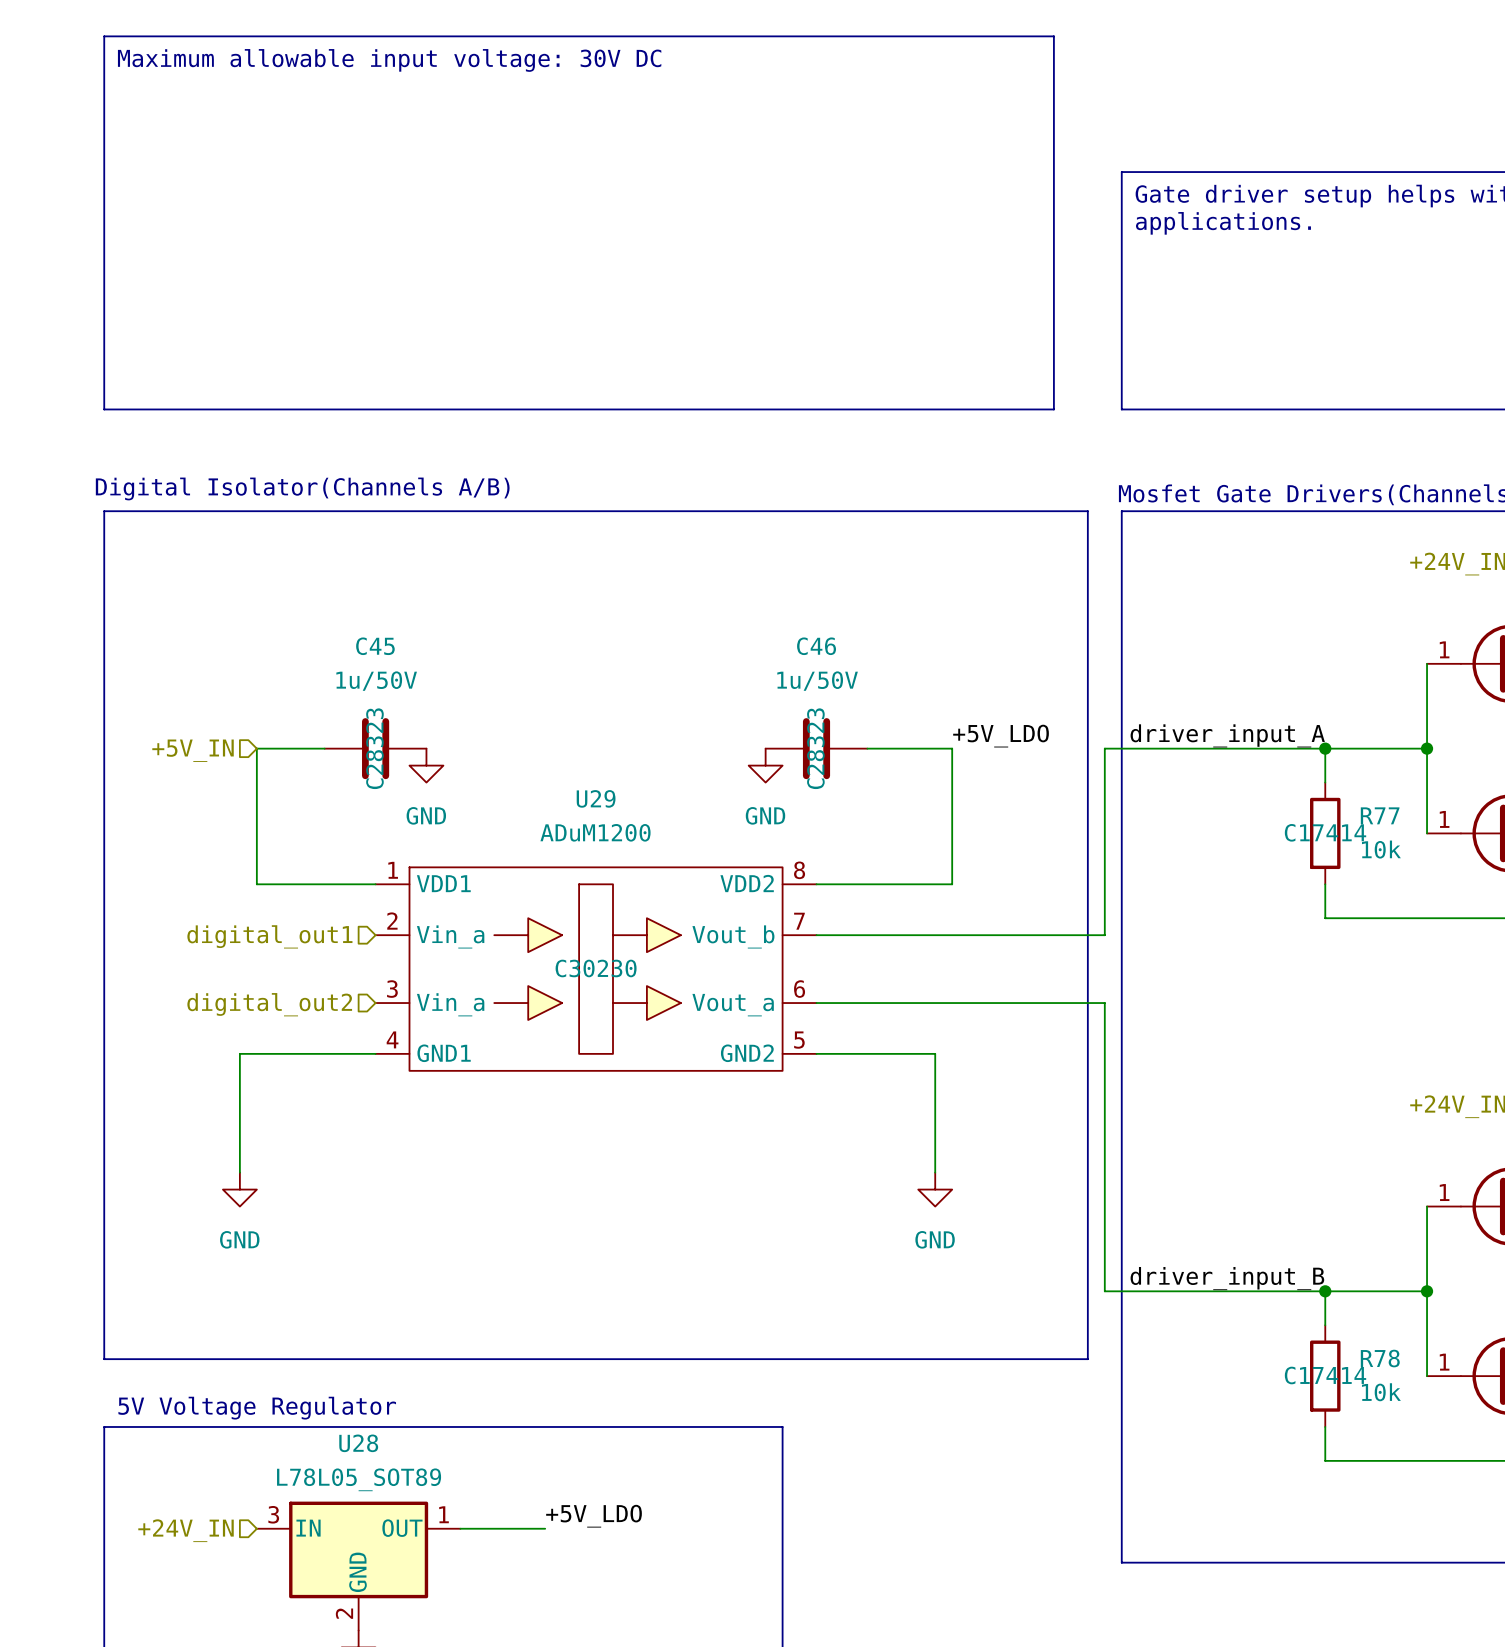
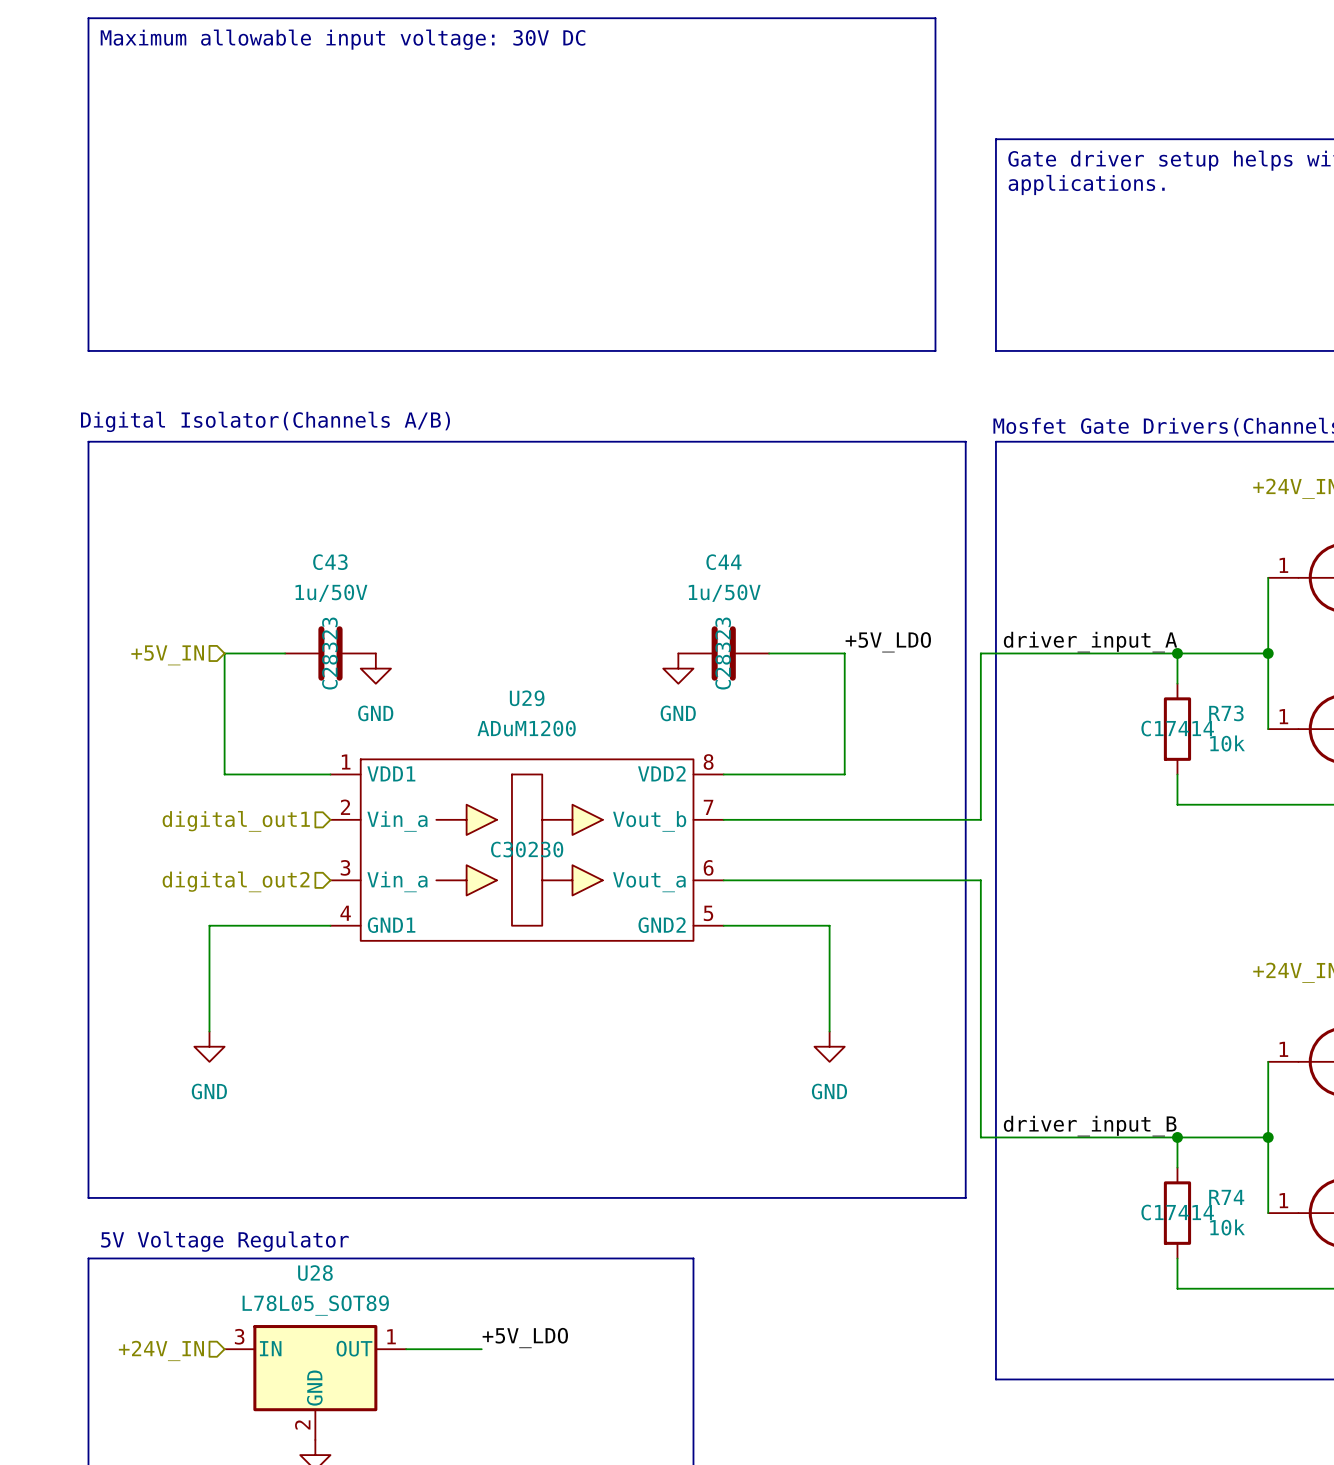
C45 name: C45 (375, 646) -> C43 (330, 562)
C46 name: C46 (816, 646) -> C44 (723, 562)
R77 name: R77 (1380, 815) -> R73 (1226, 713)
R78 name: R78 (1380, 1358) -> R74 (1226, 1197)

